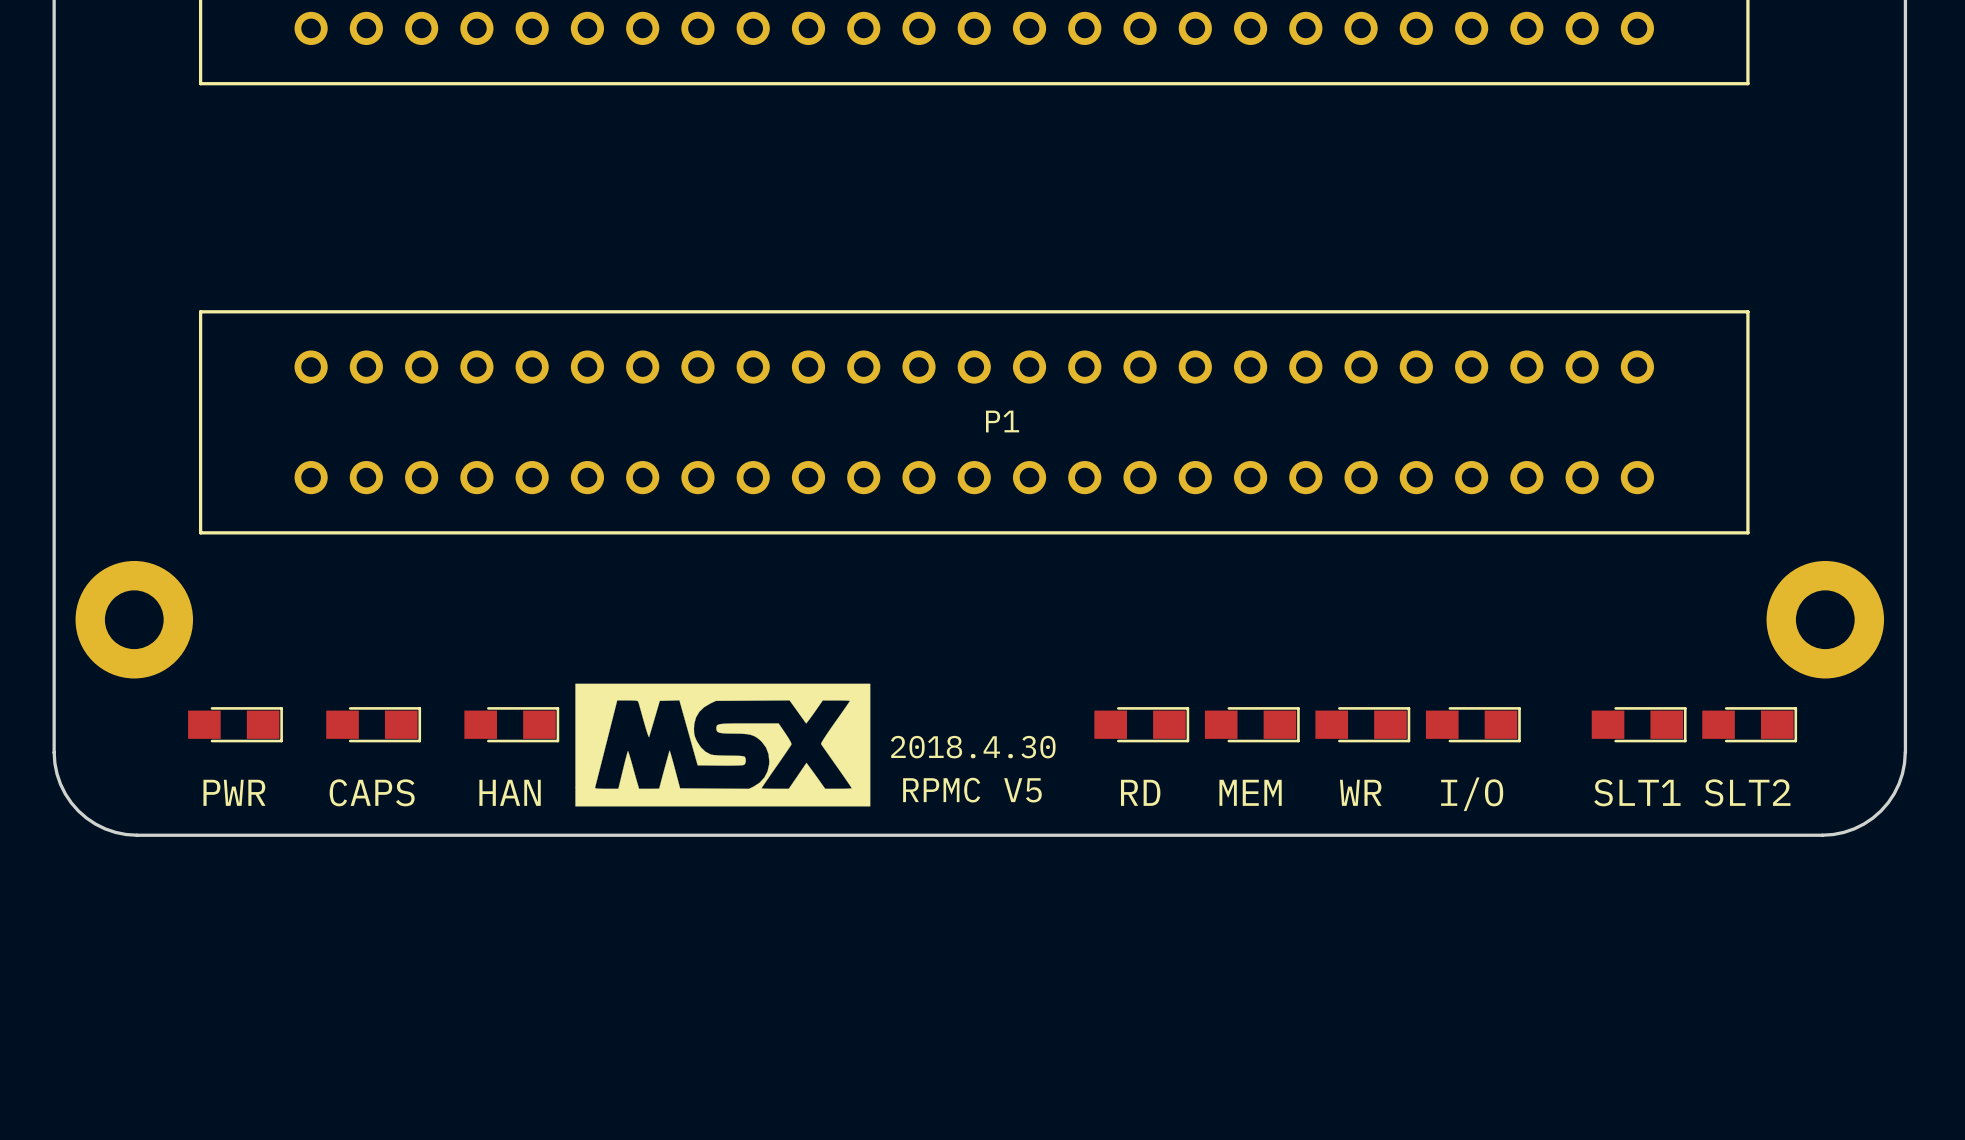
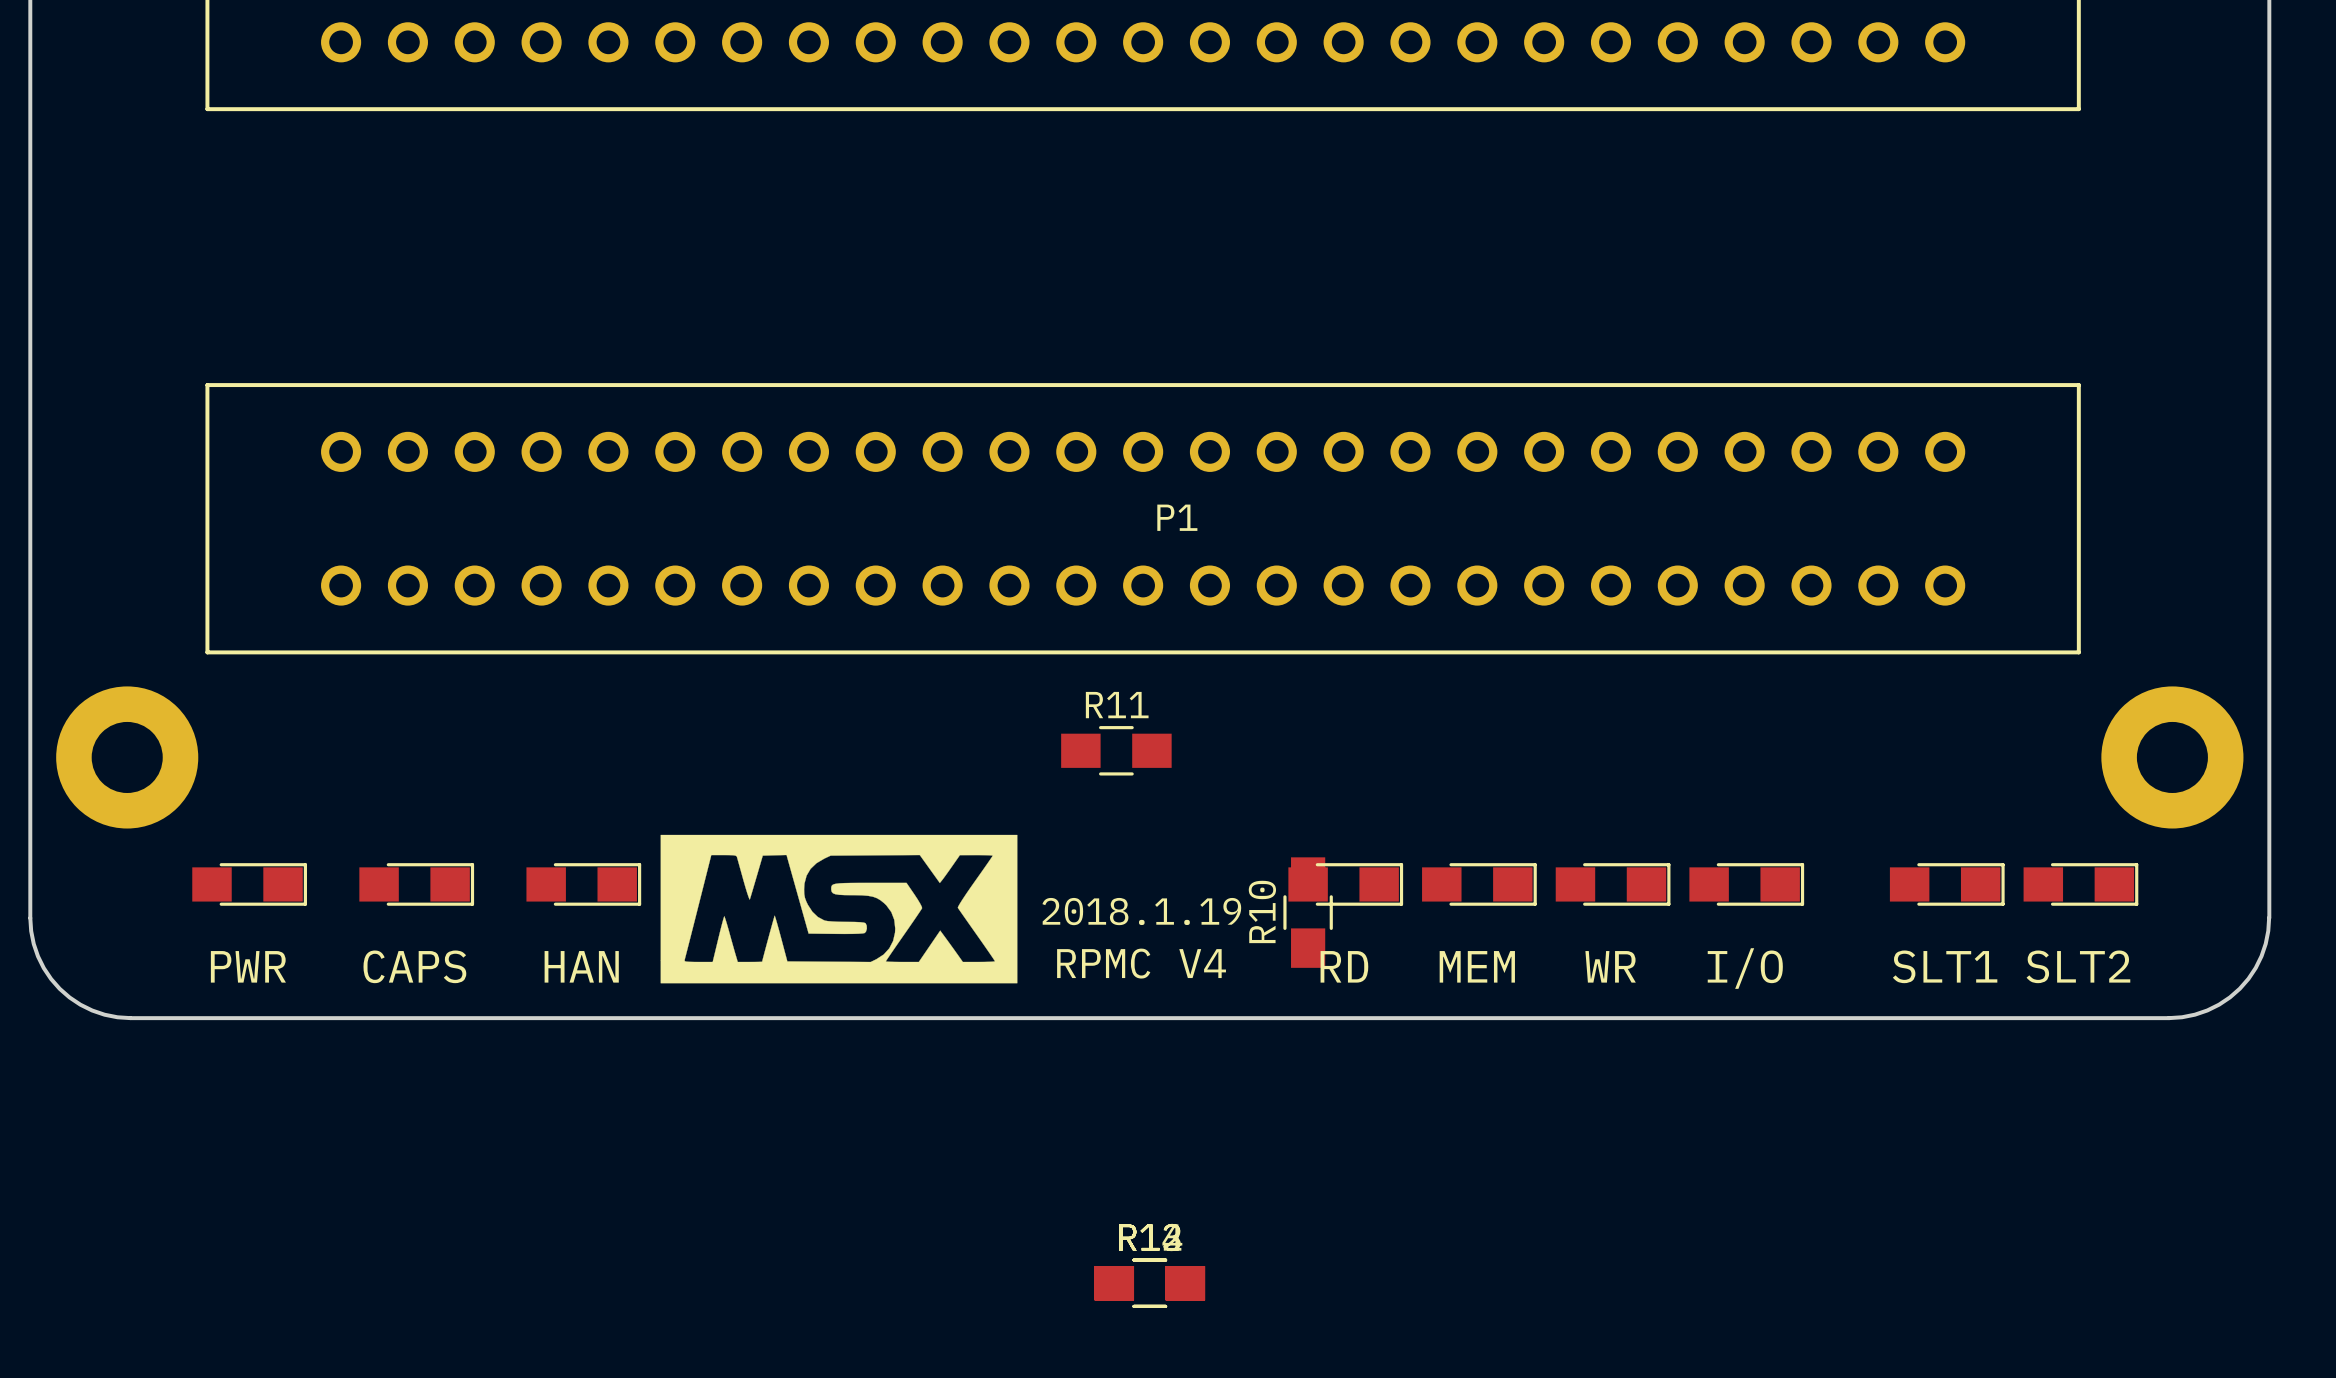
R11: none -> (1116, 750)
text: 2018.4.30 (973, 747) -> 2018.1.19 (1141, 911)
R10: none -> (1308, 912)
text: RPMC V5 (972, 790) -> RPMC V4 (1141, 963)
part: none -> (1149, 1283)
part: none -> (1149, 1283)
part: none -> (1149, 1283)

